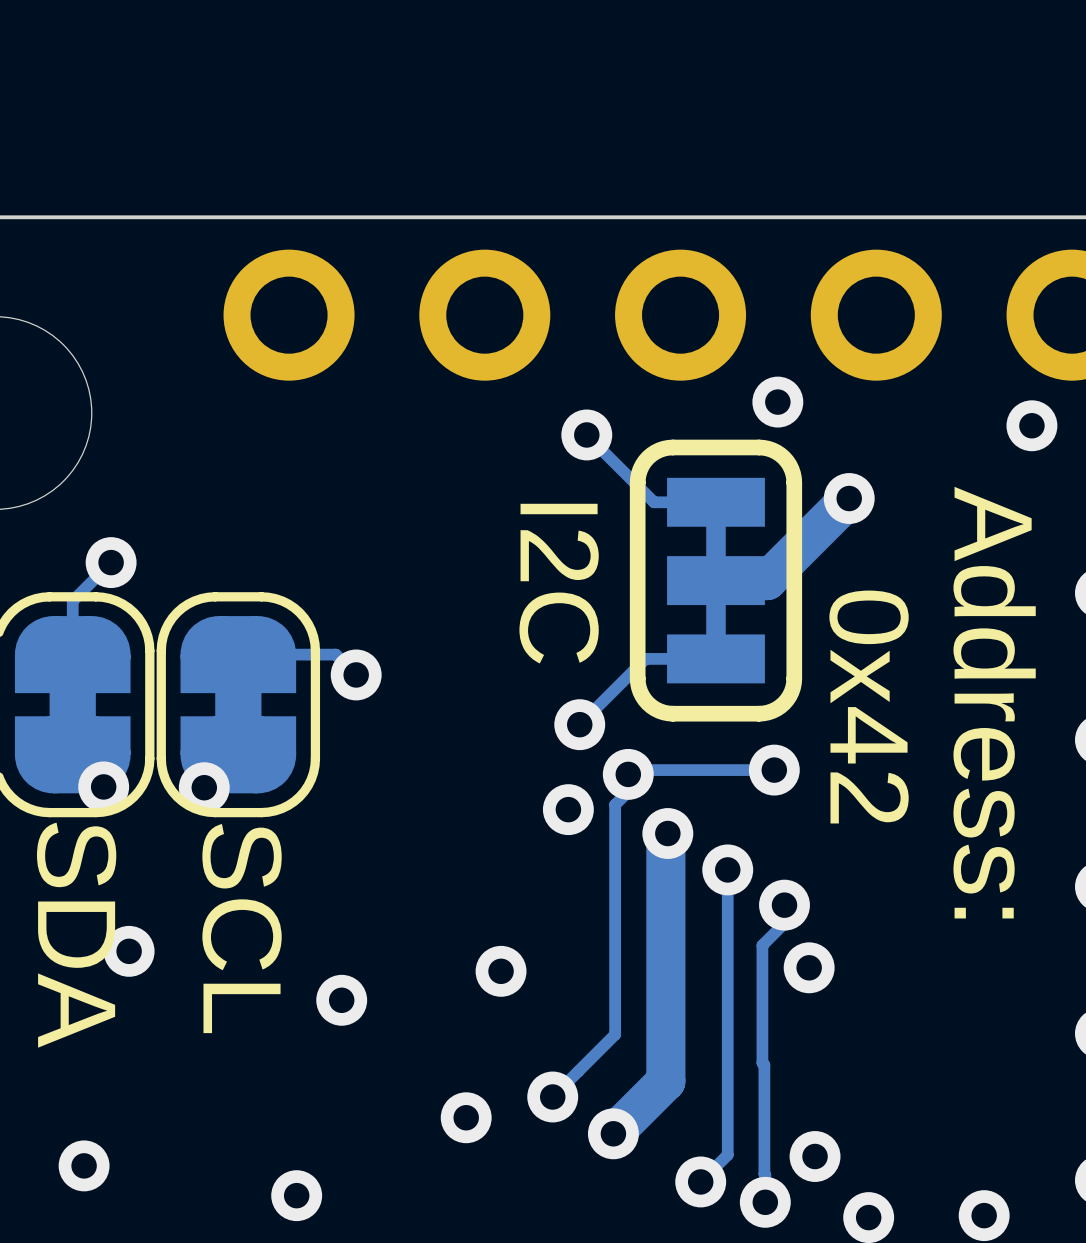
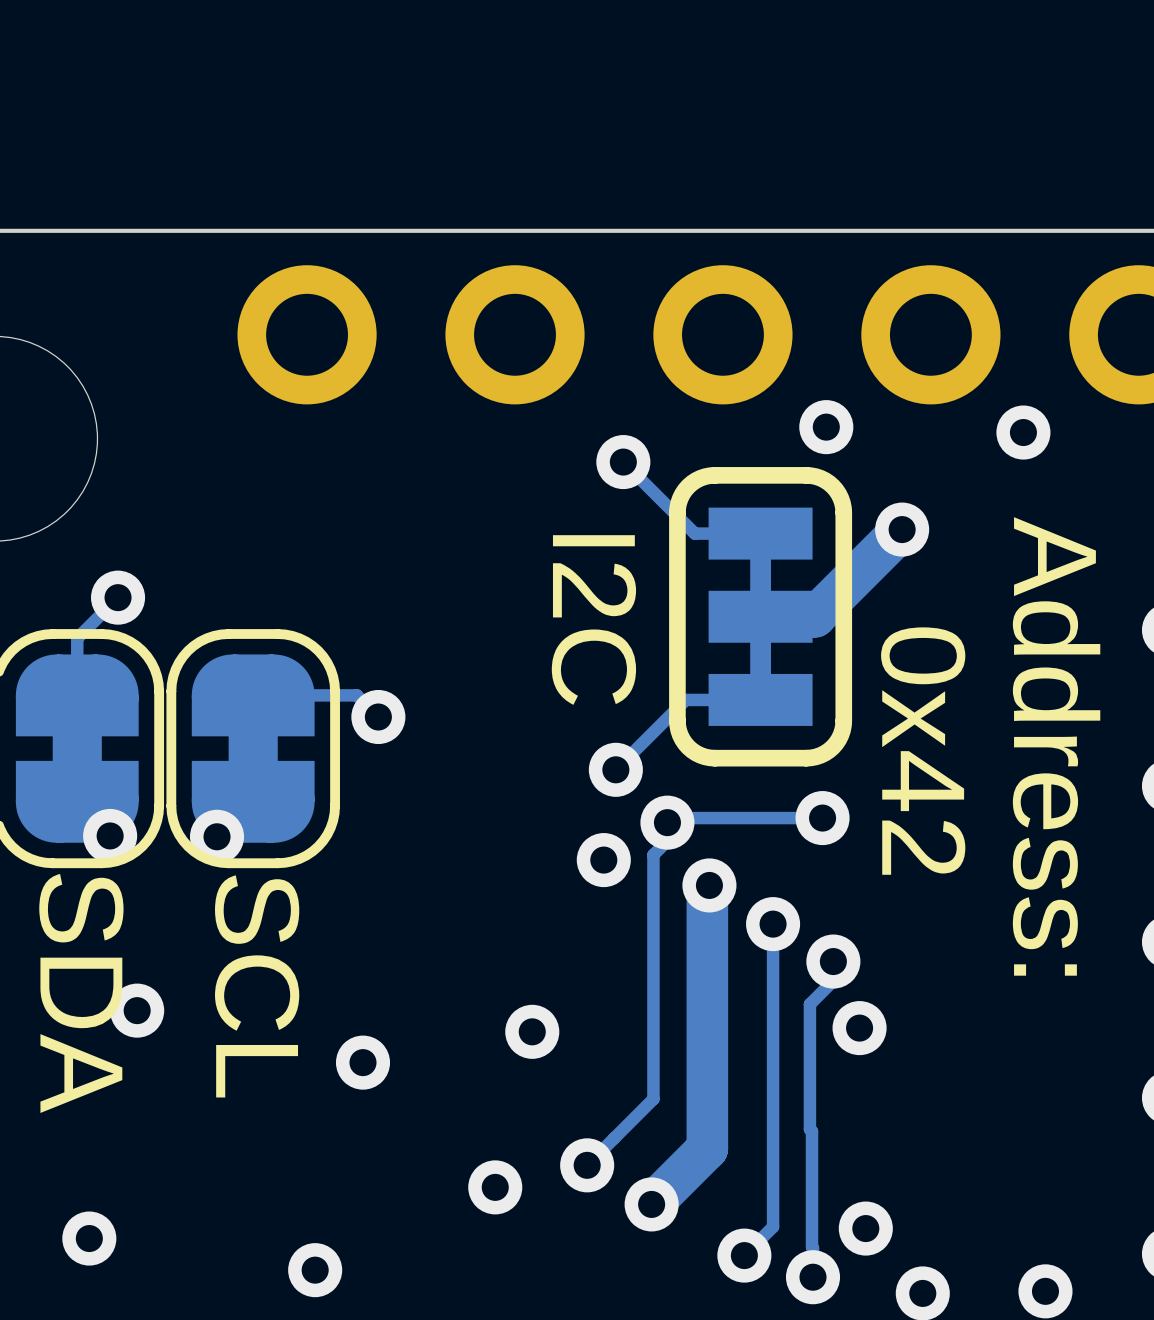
via position: (1031, 425) -> (1023, 432)

